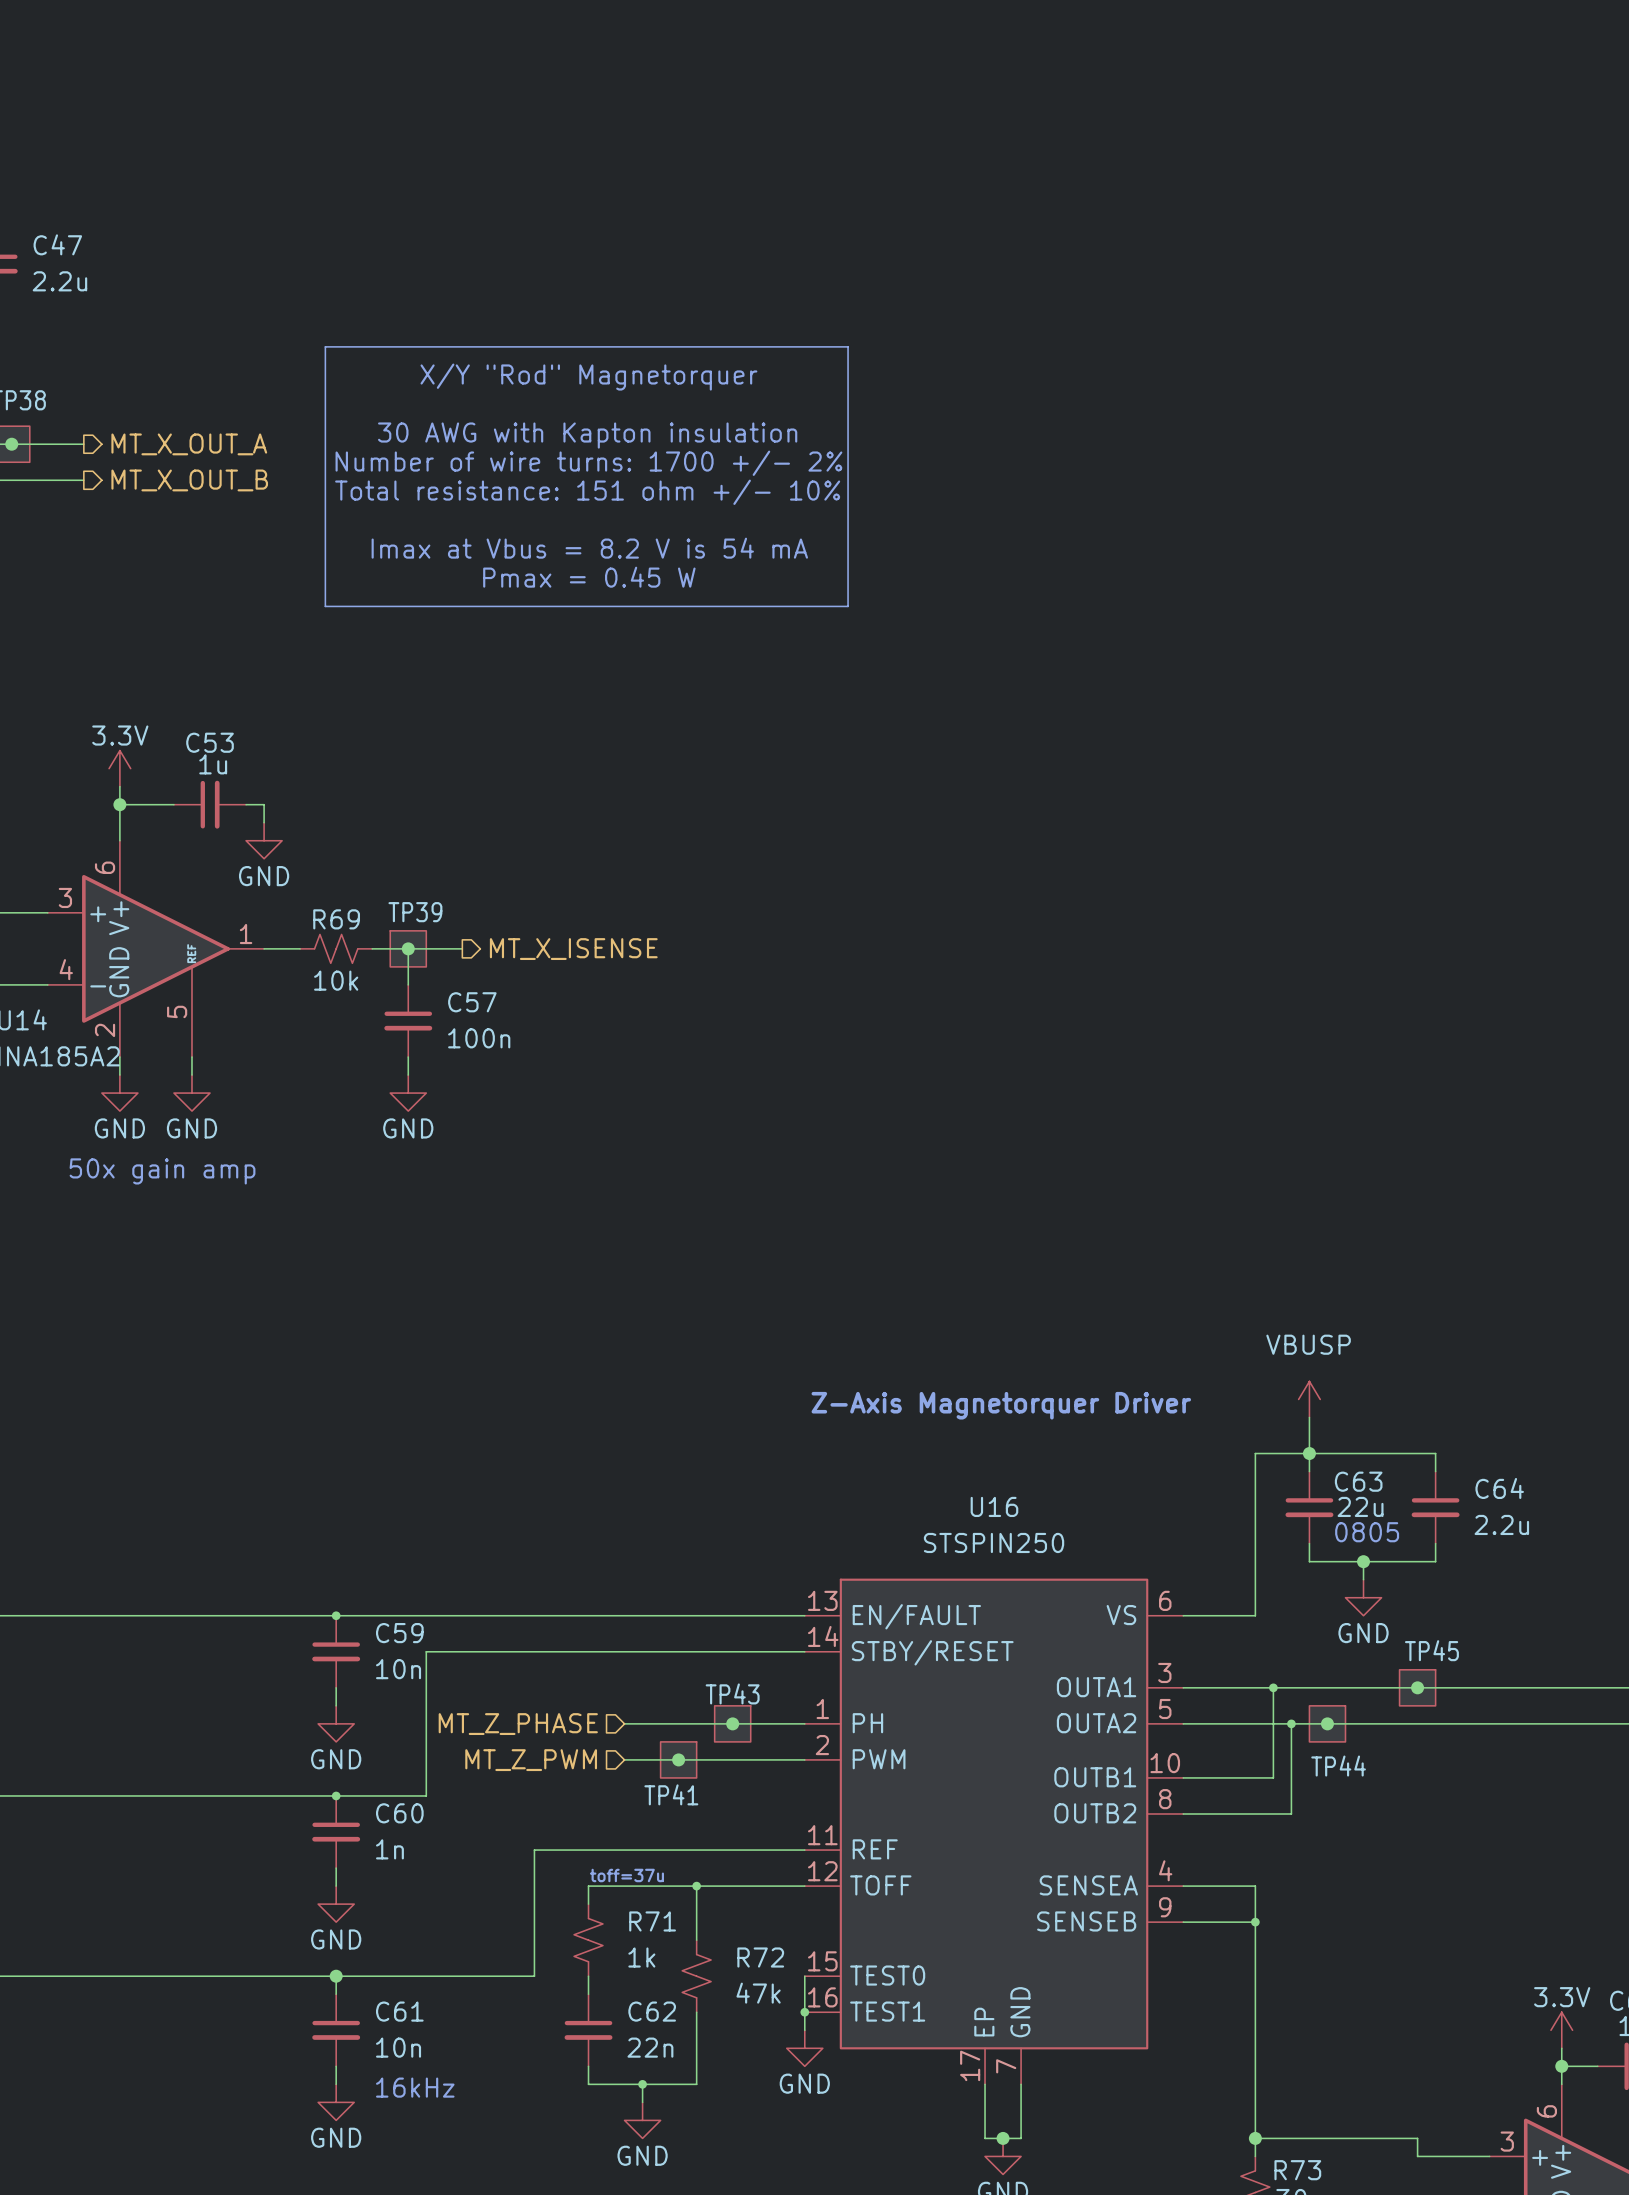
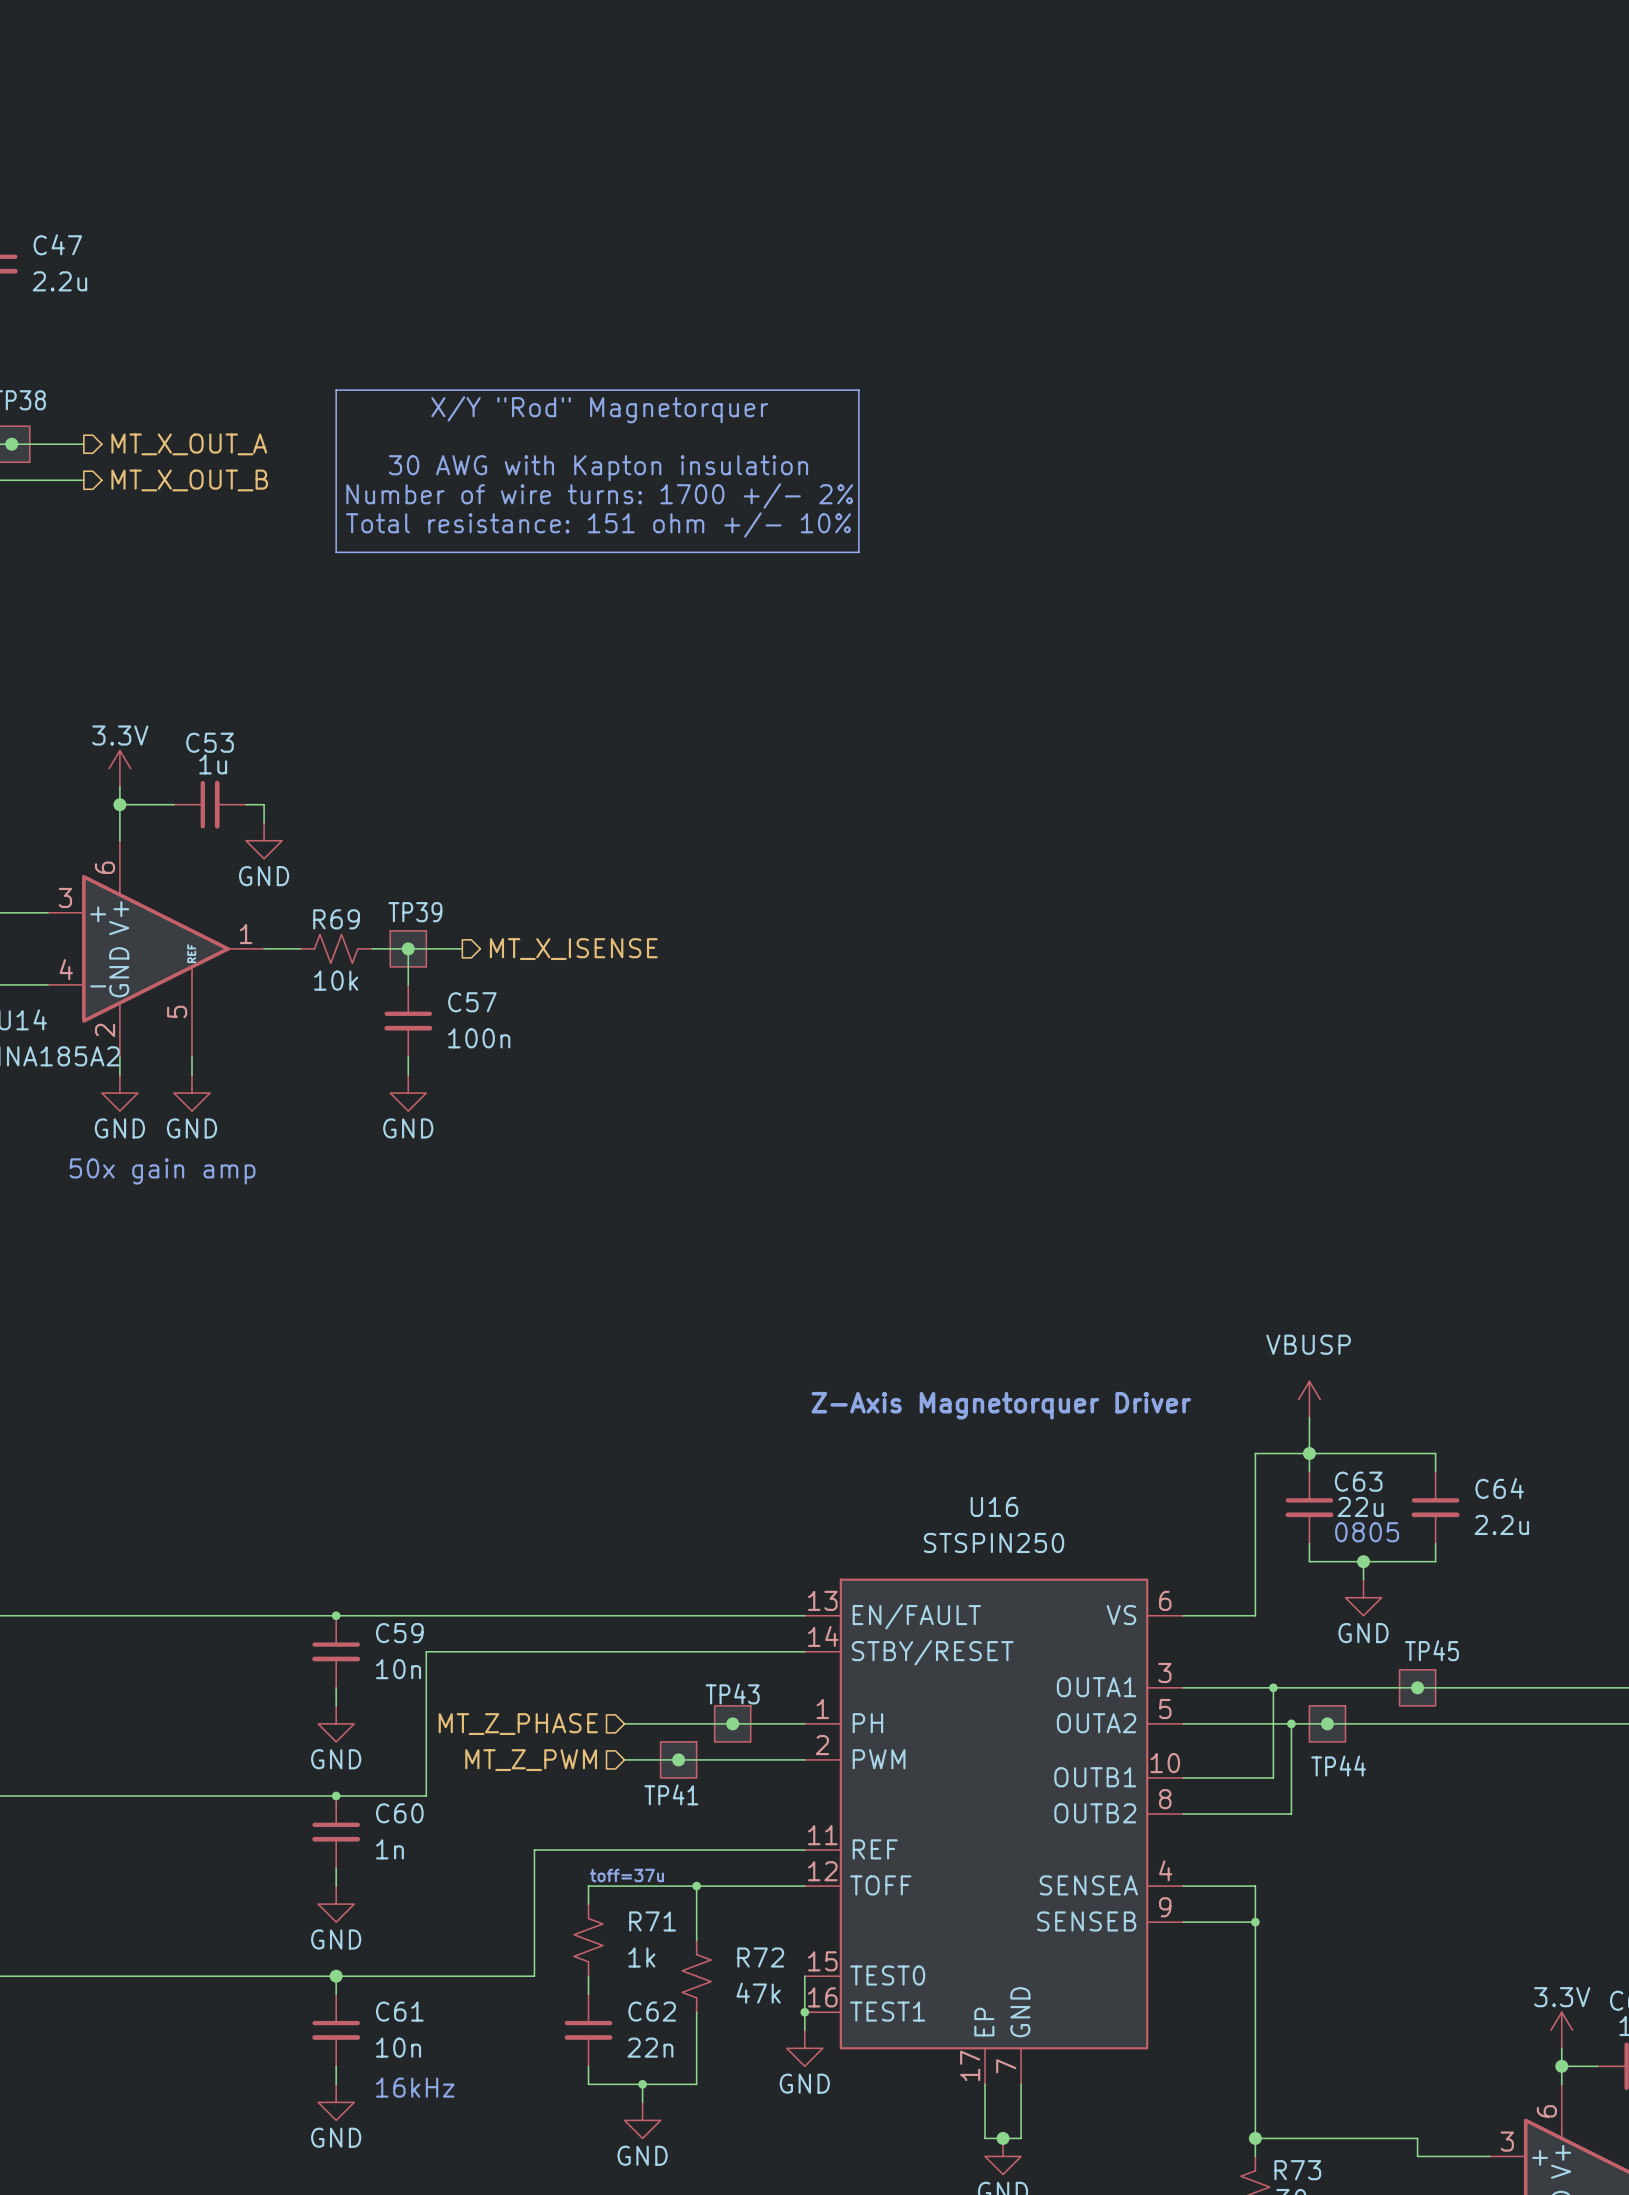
line: (325, 346) (848, 346) (848, 606) (325, 606) (325, 346) -> (336, 390) (336, 552) (858, 552) (858, 390) (336, 390)
text position: X/Y "Rod" Magnetorquer (588, 377) -> X/Y "Rod" Magnetorquer (599, 409)
text: 30 AWG with Kapton insulation (587, 435) -> none
text: Number of wire turns: 1700 +/- 2% (588, 463) -> 30 AWG with Kapton insulation (598, 468)
text: Total resistance: 151 ohm +/- 10% (587, 492) -> Number of wire turns: 1700 +/- 2% (599, 495)
text: none -> Total resistance: 151 ohm +/- 10% (598, 524)
text: Imax at Vbus = 8.2 V is 54 mA (589, 548) -> none
text: Pmax = 0.45 W (589, 577) -> none

